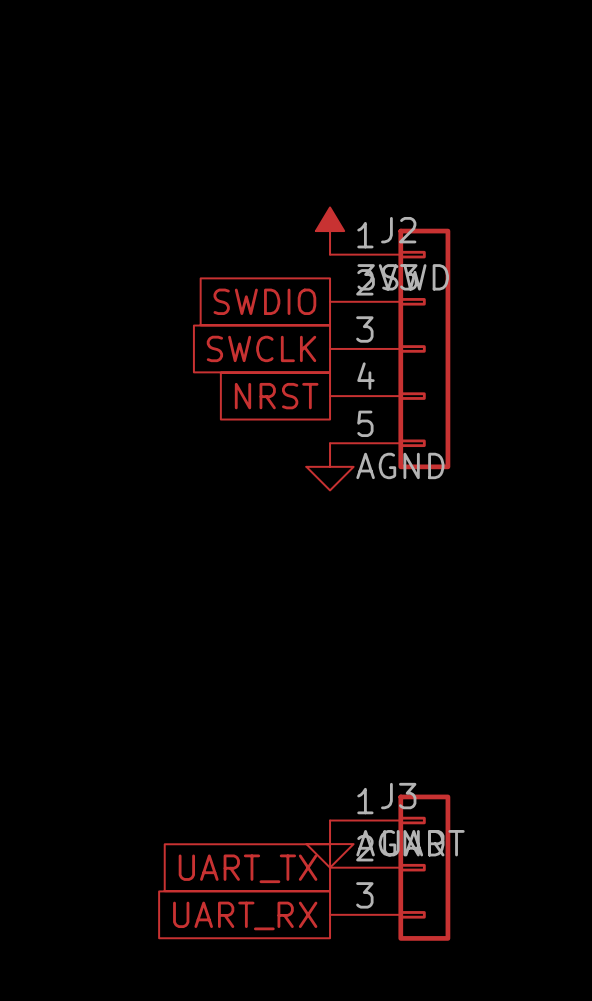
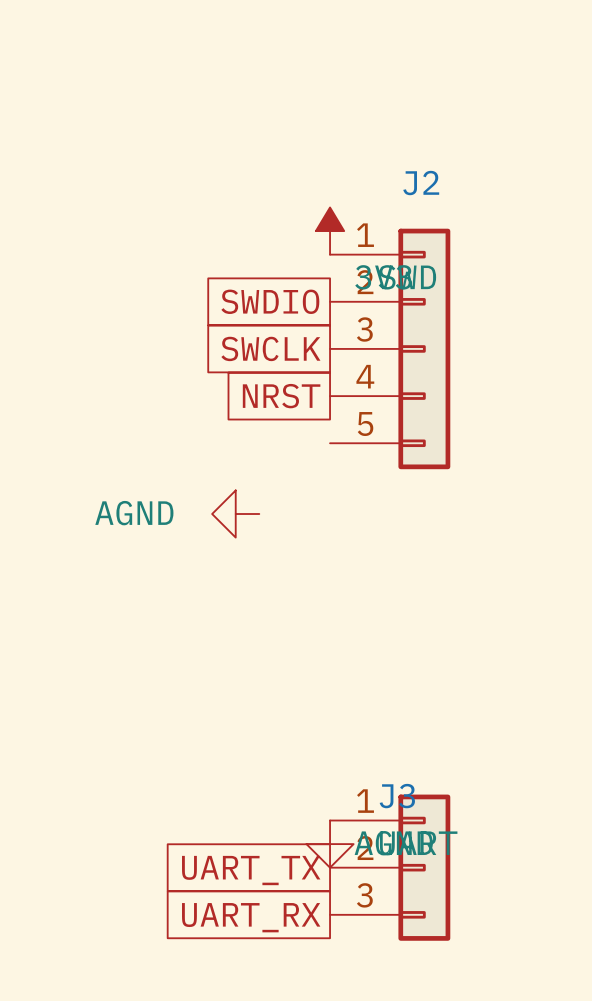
J2 name position: J2 (398, 230) -> J2 (421, 183)
power symbol text position: AGND (400, 465) -> AGND (134, 513)
power symbol rotation: 0° (330, 466) -> 90° clockwise (235, 514)
power symbol position: AGND (330, 466) -> AGND (235, 514)

